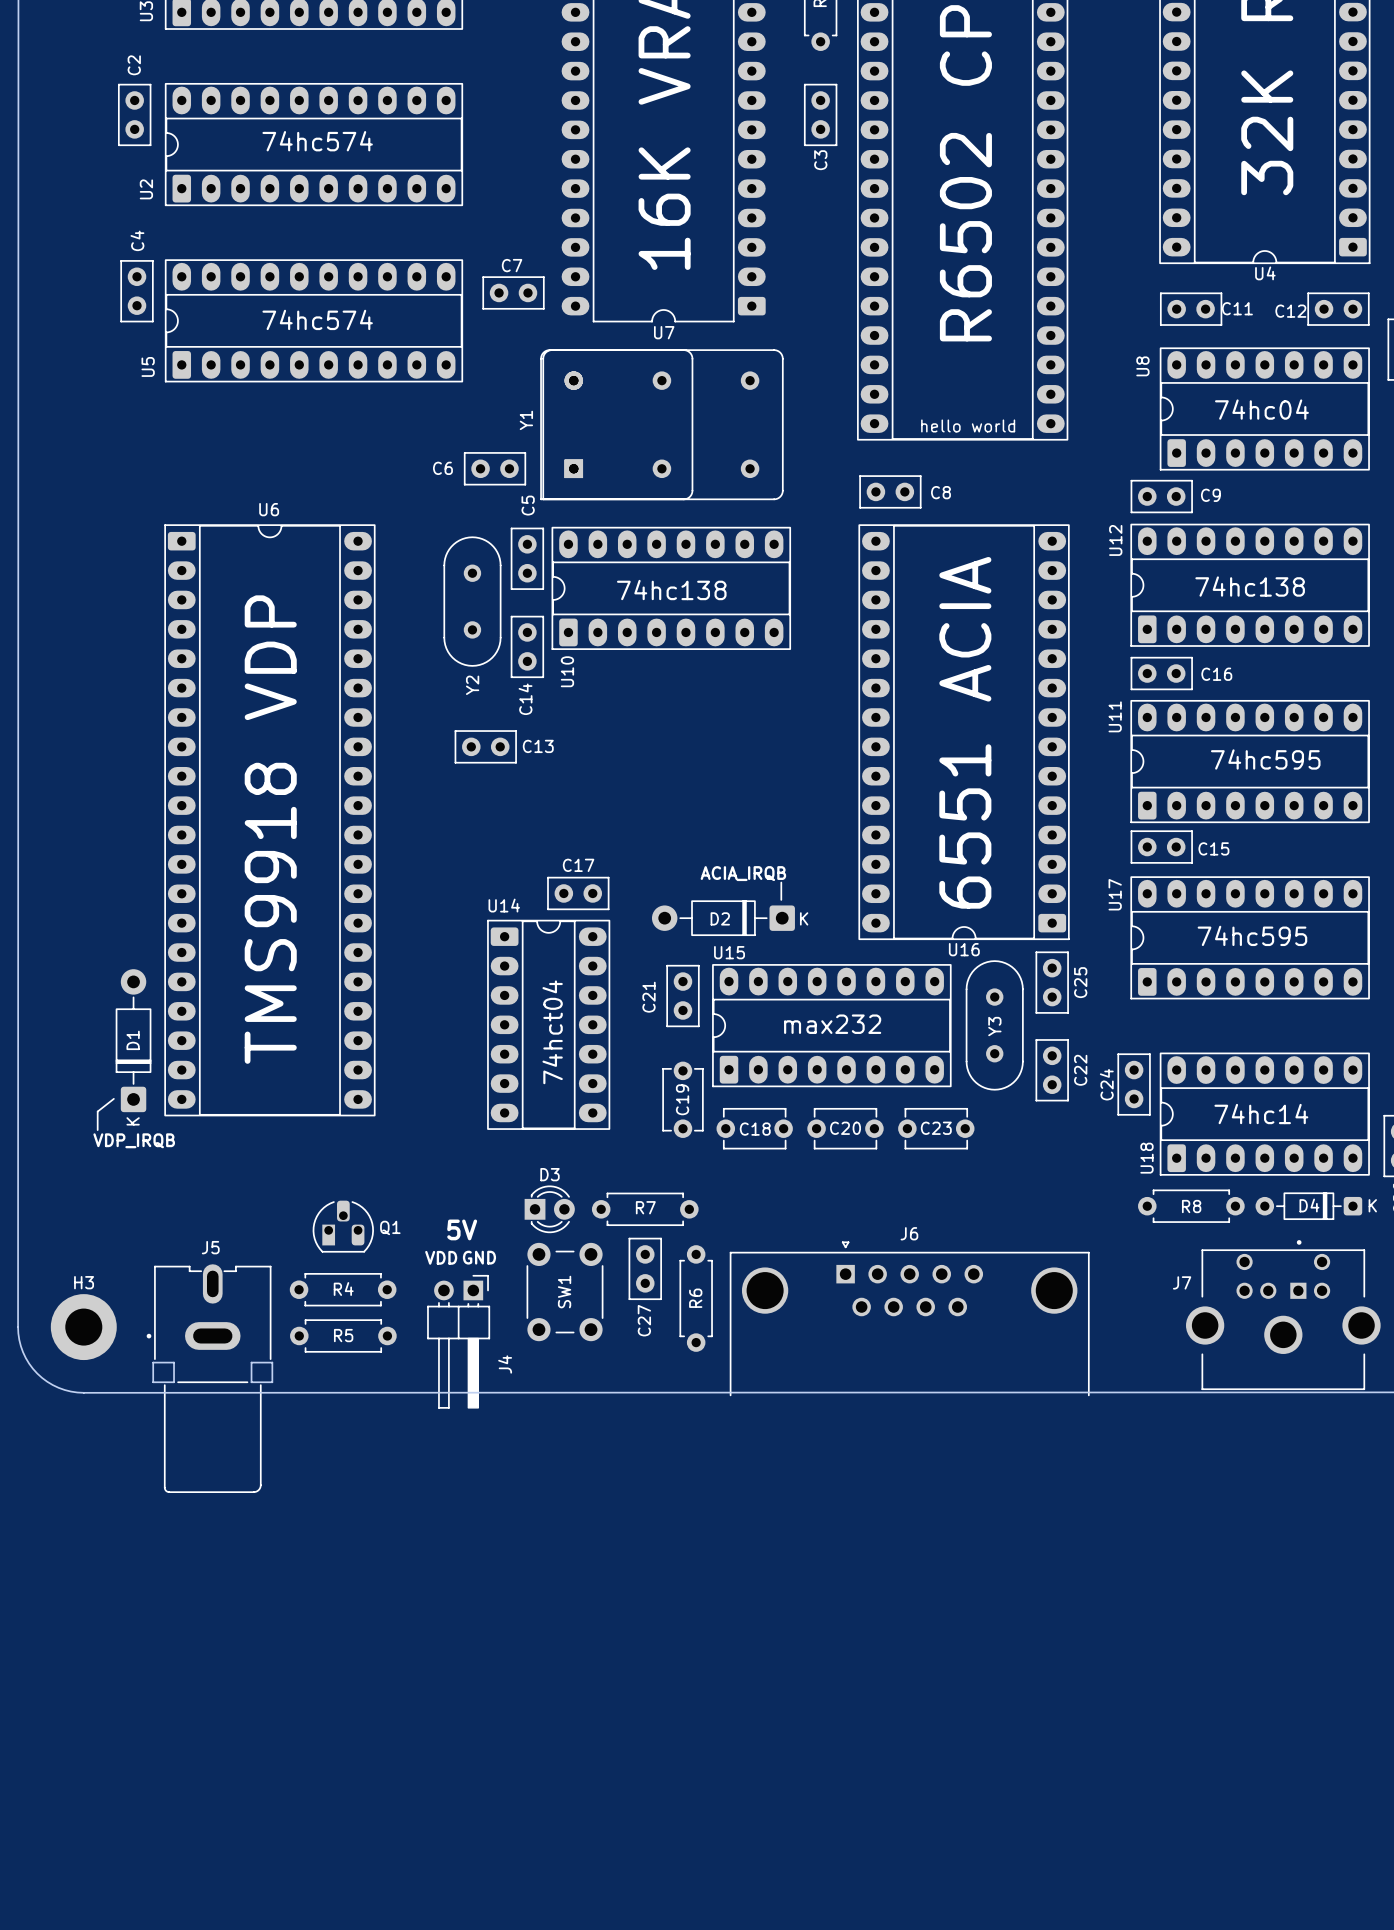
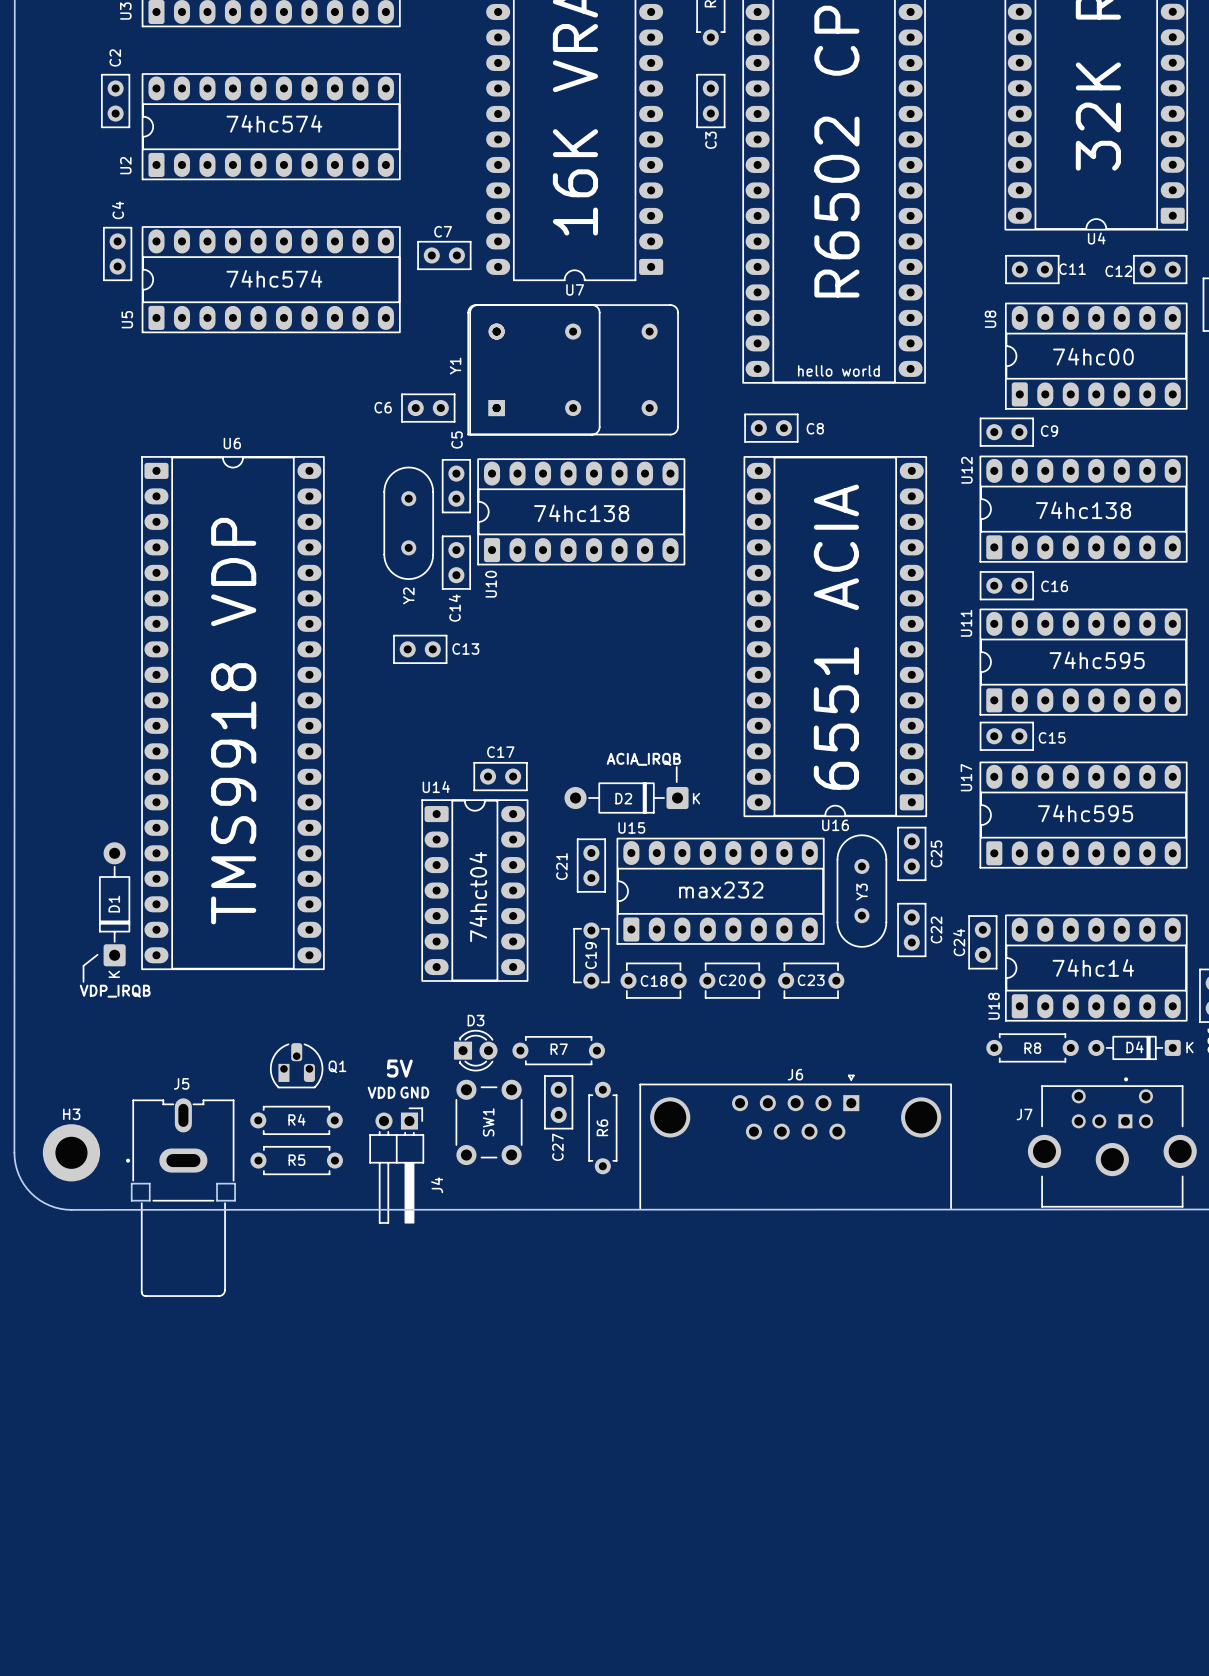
text: 74hc04 (1261, 409) -> 74hc00 (1093, 356)
J6 footprint: [729, 1241, 1090, 1397] -> [639, 1074, 952, 1209]

